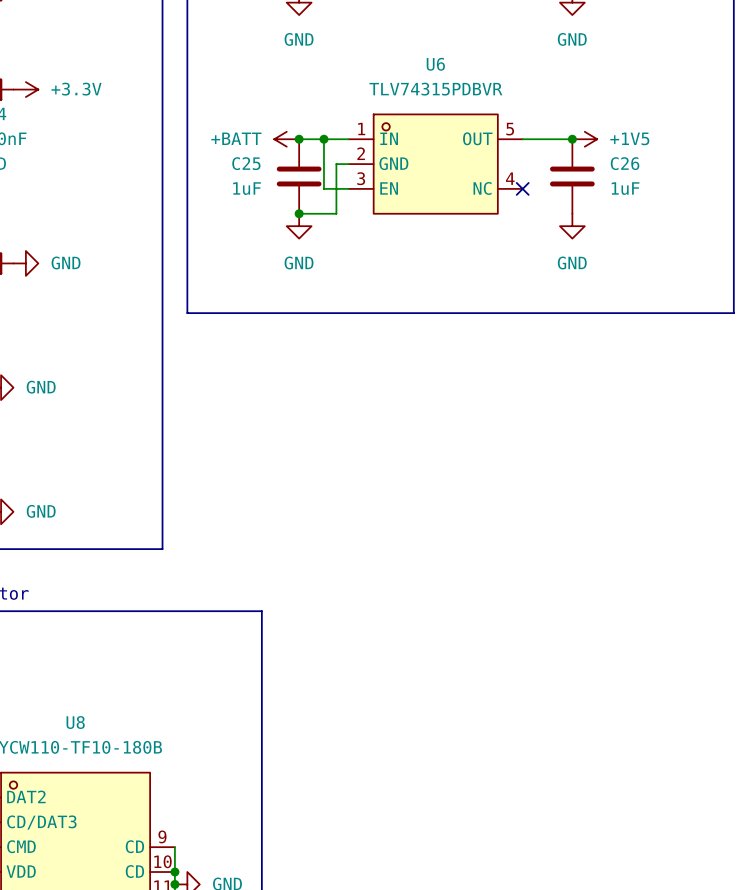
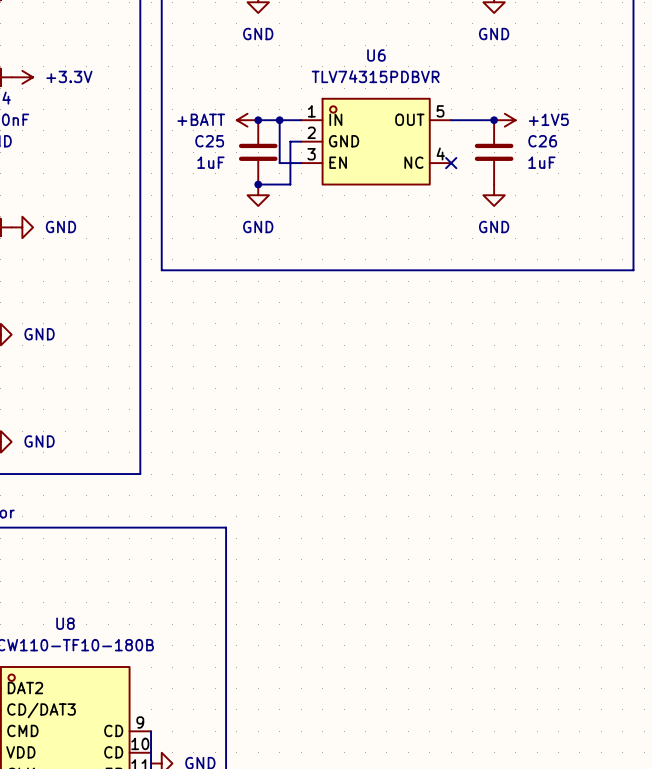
junction: (174, 872) -> none
junction: (174, 884) -> none

